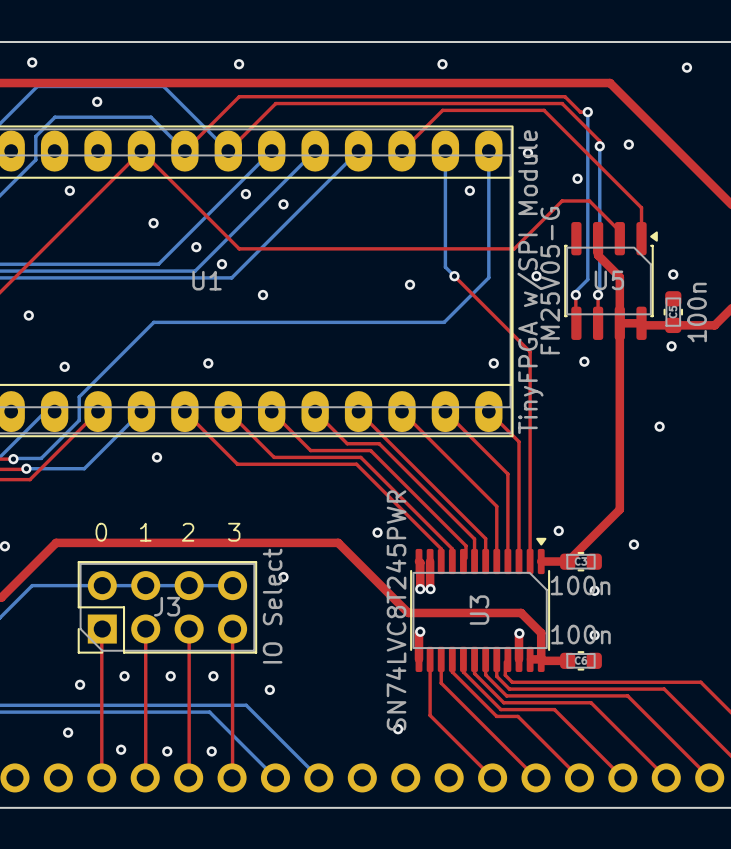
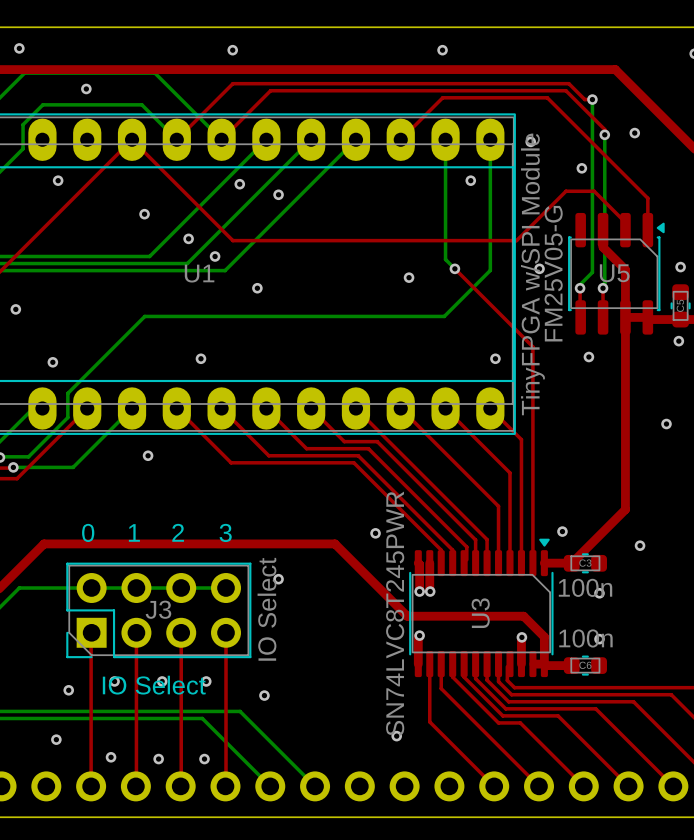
text: none -> IO Select (154, 685)

